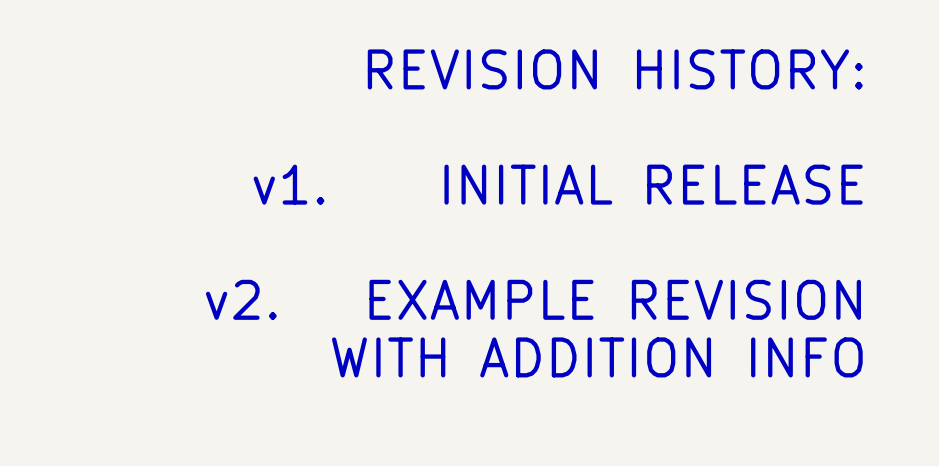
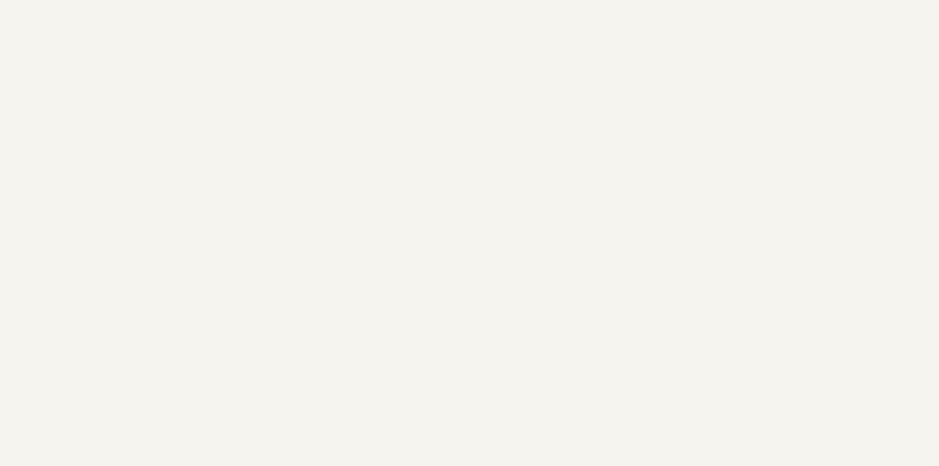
text: REVISION HISTORY: (615, 69) -> none
text: v1. INITIAL RELEASE (558, 184) -> none
text: v2. EXAMPLE REVISION (533, 299) -> none
text: WITH ADDITION INFO (597, 357) -> none

